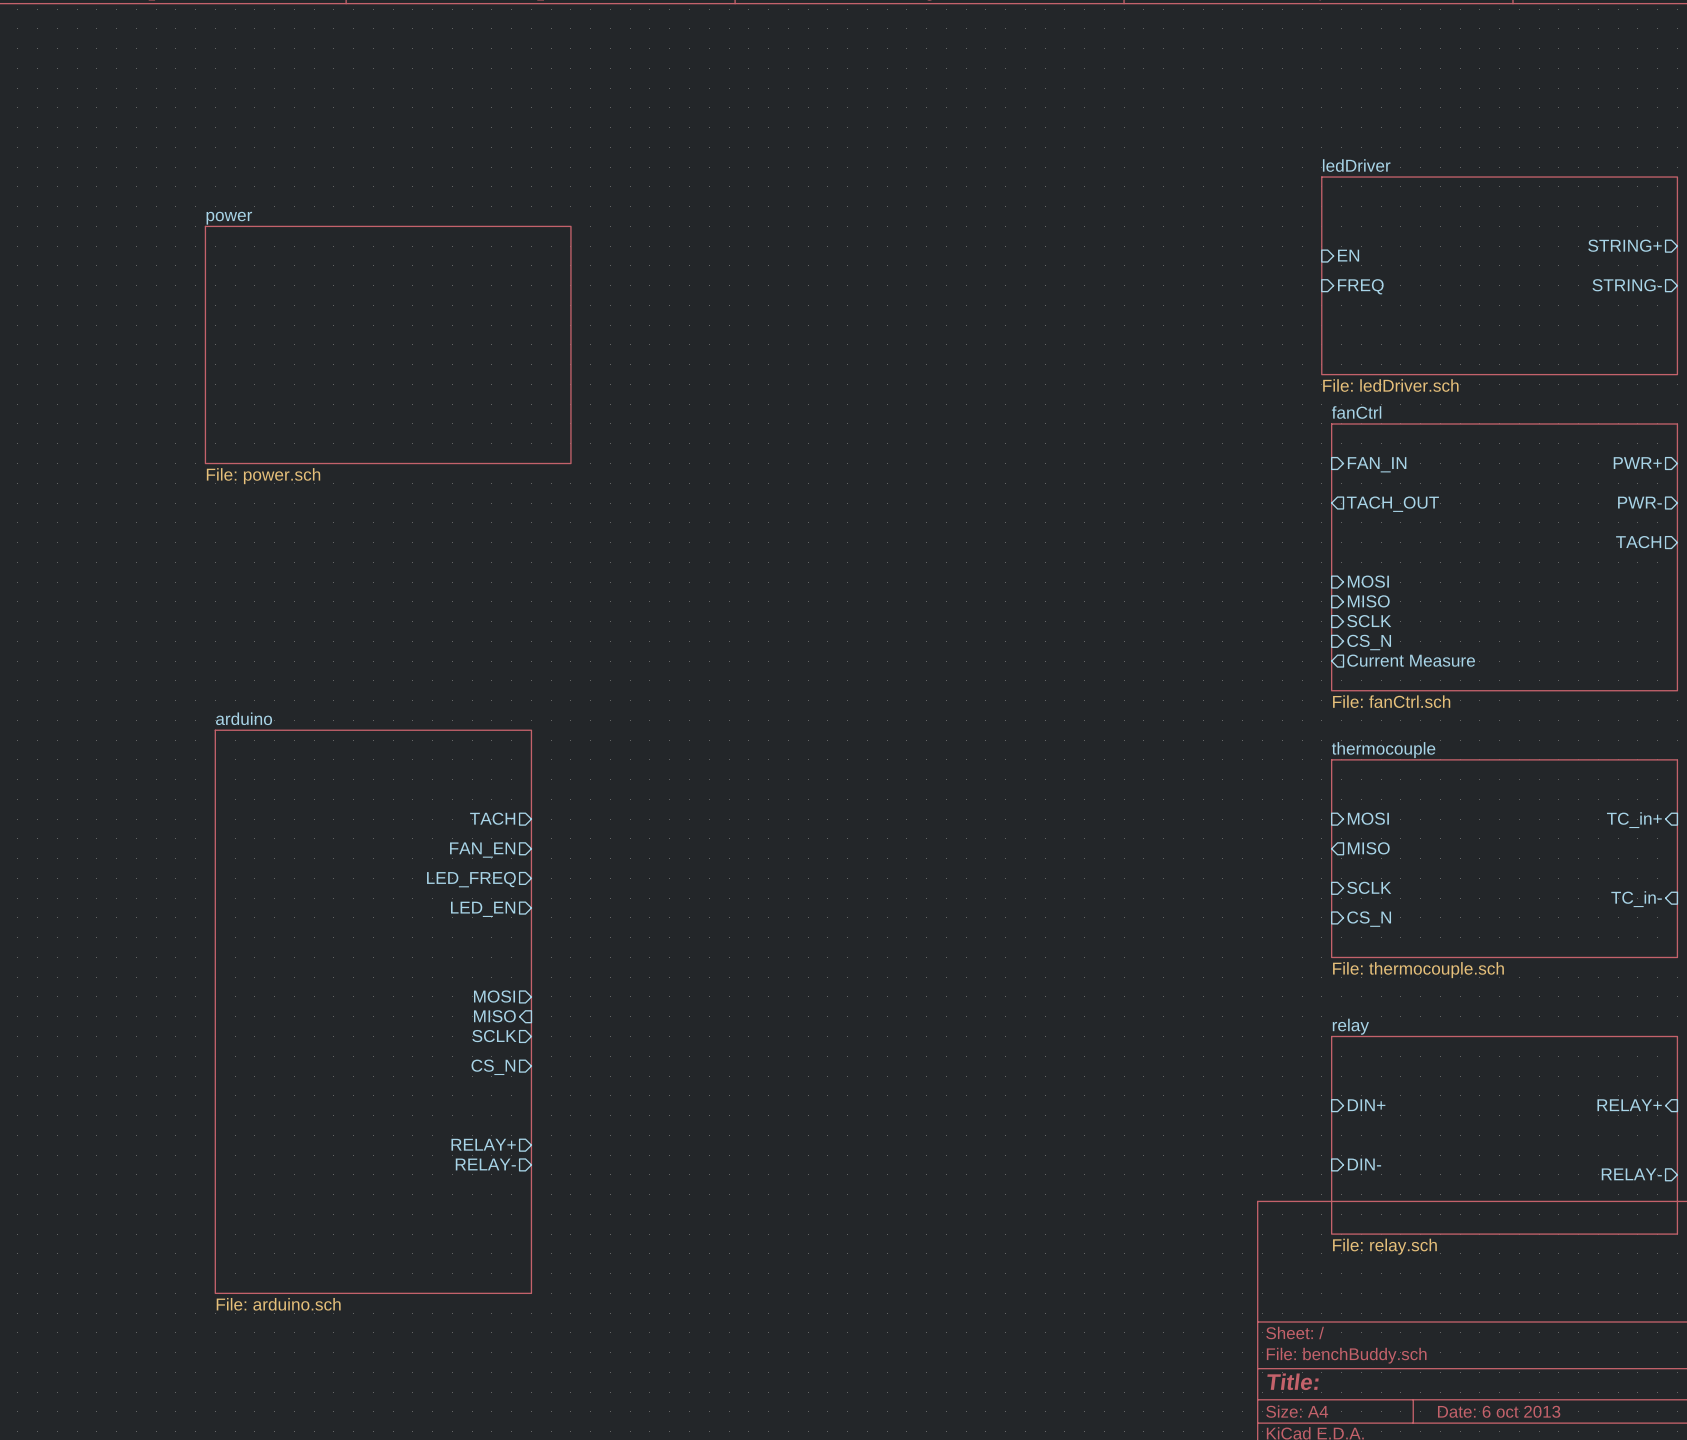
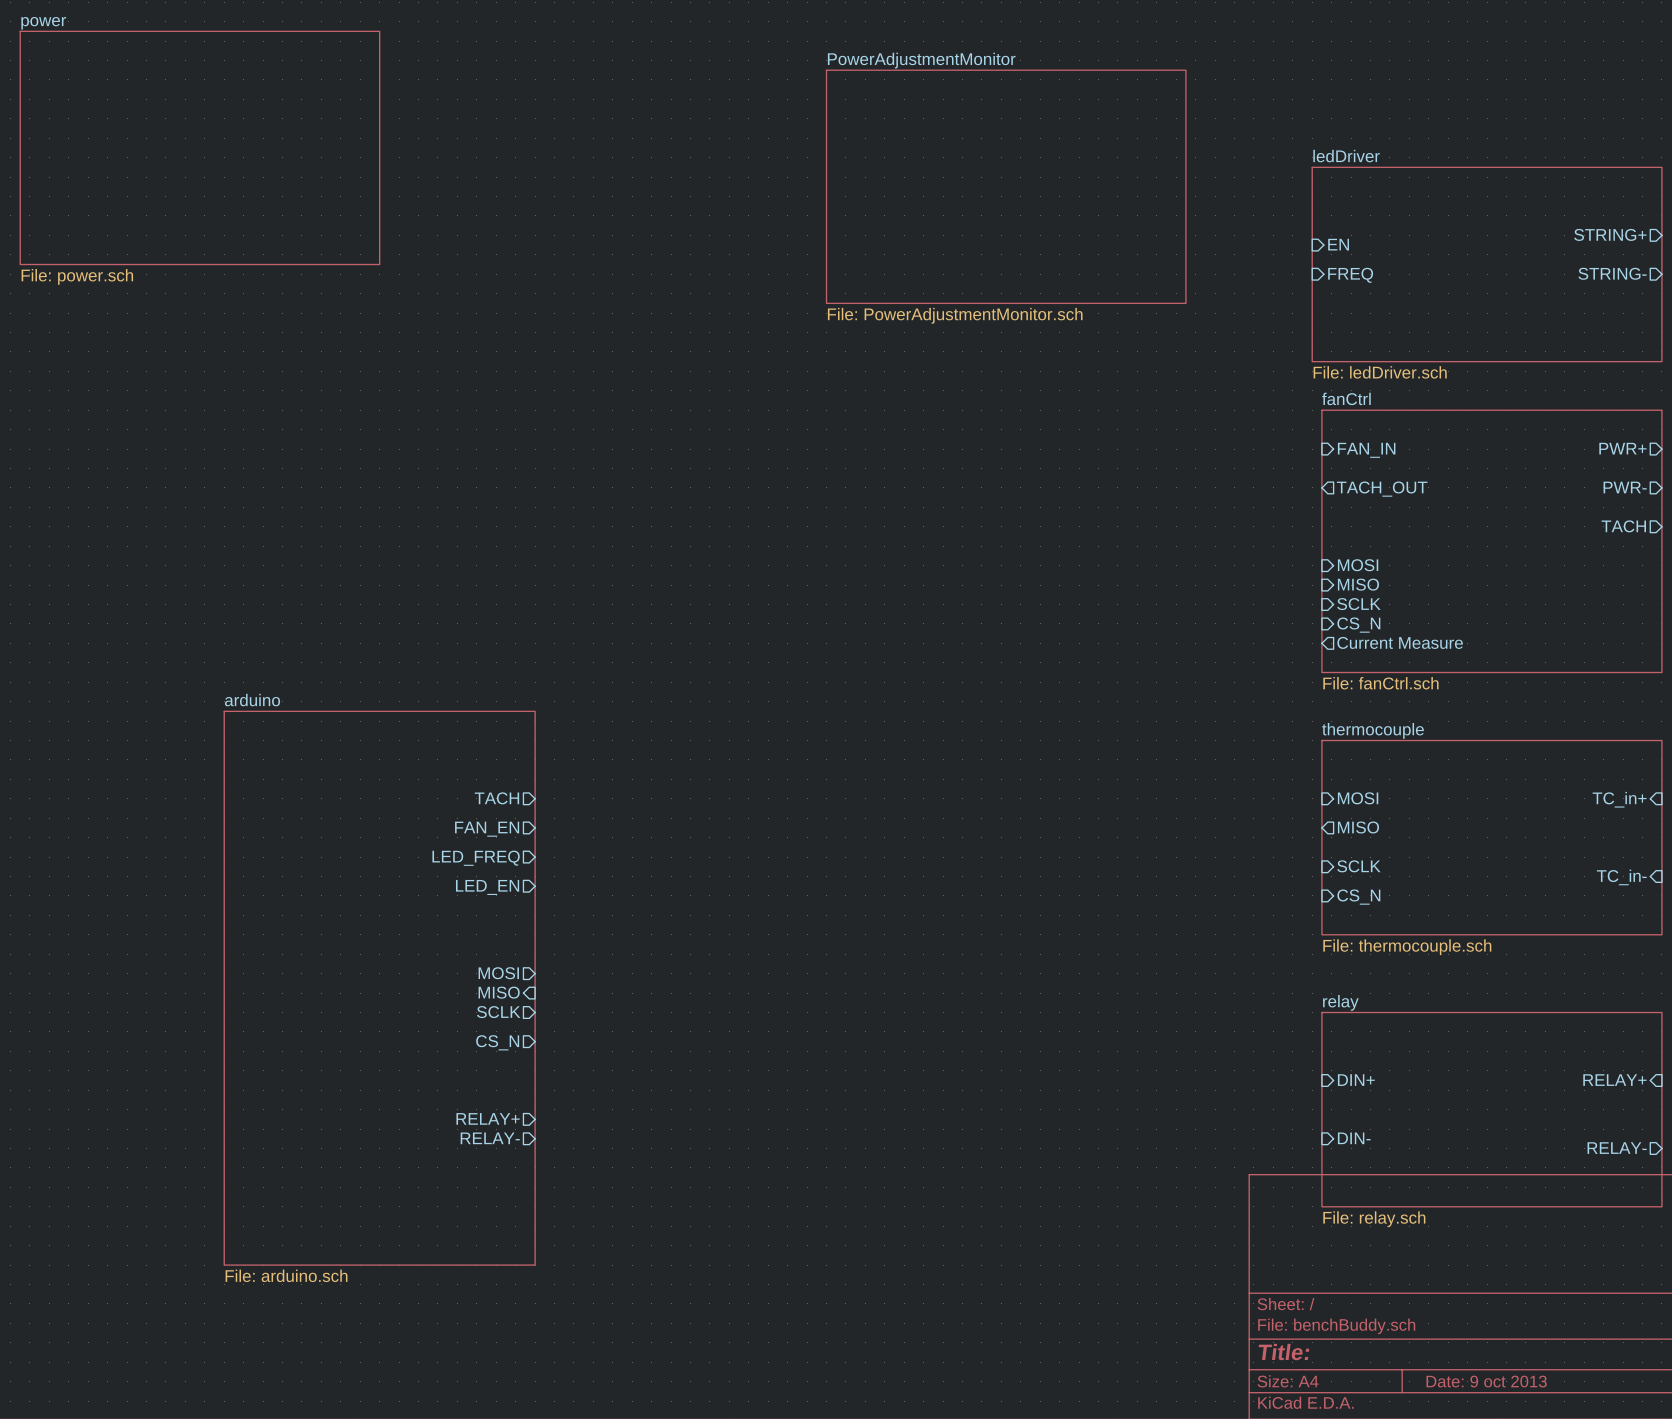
sheet power: none -> File: power.sch (199, 147)
sheet PowerAdjustmentMonitor: none -> File: PowerAdjustmentMonitor.sch (1006, 186)
sheet power: File: power.sch (388, 344) -> none
title block: Date: 6 oct 2013 (1499, 1411) -> Date: 9 oct 2013 (1486, 1381)

